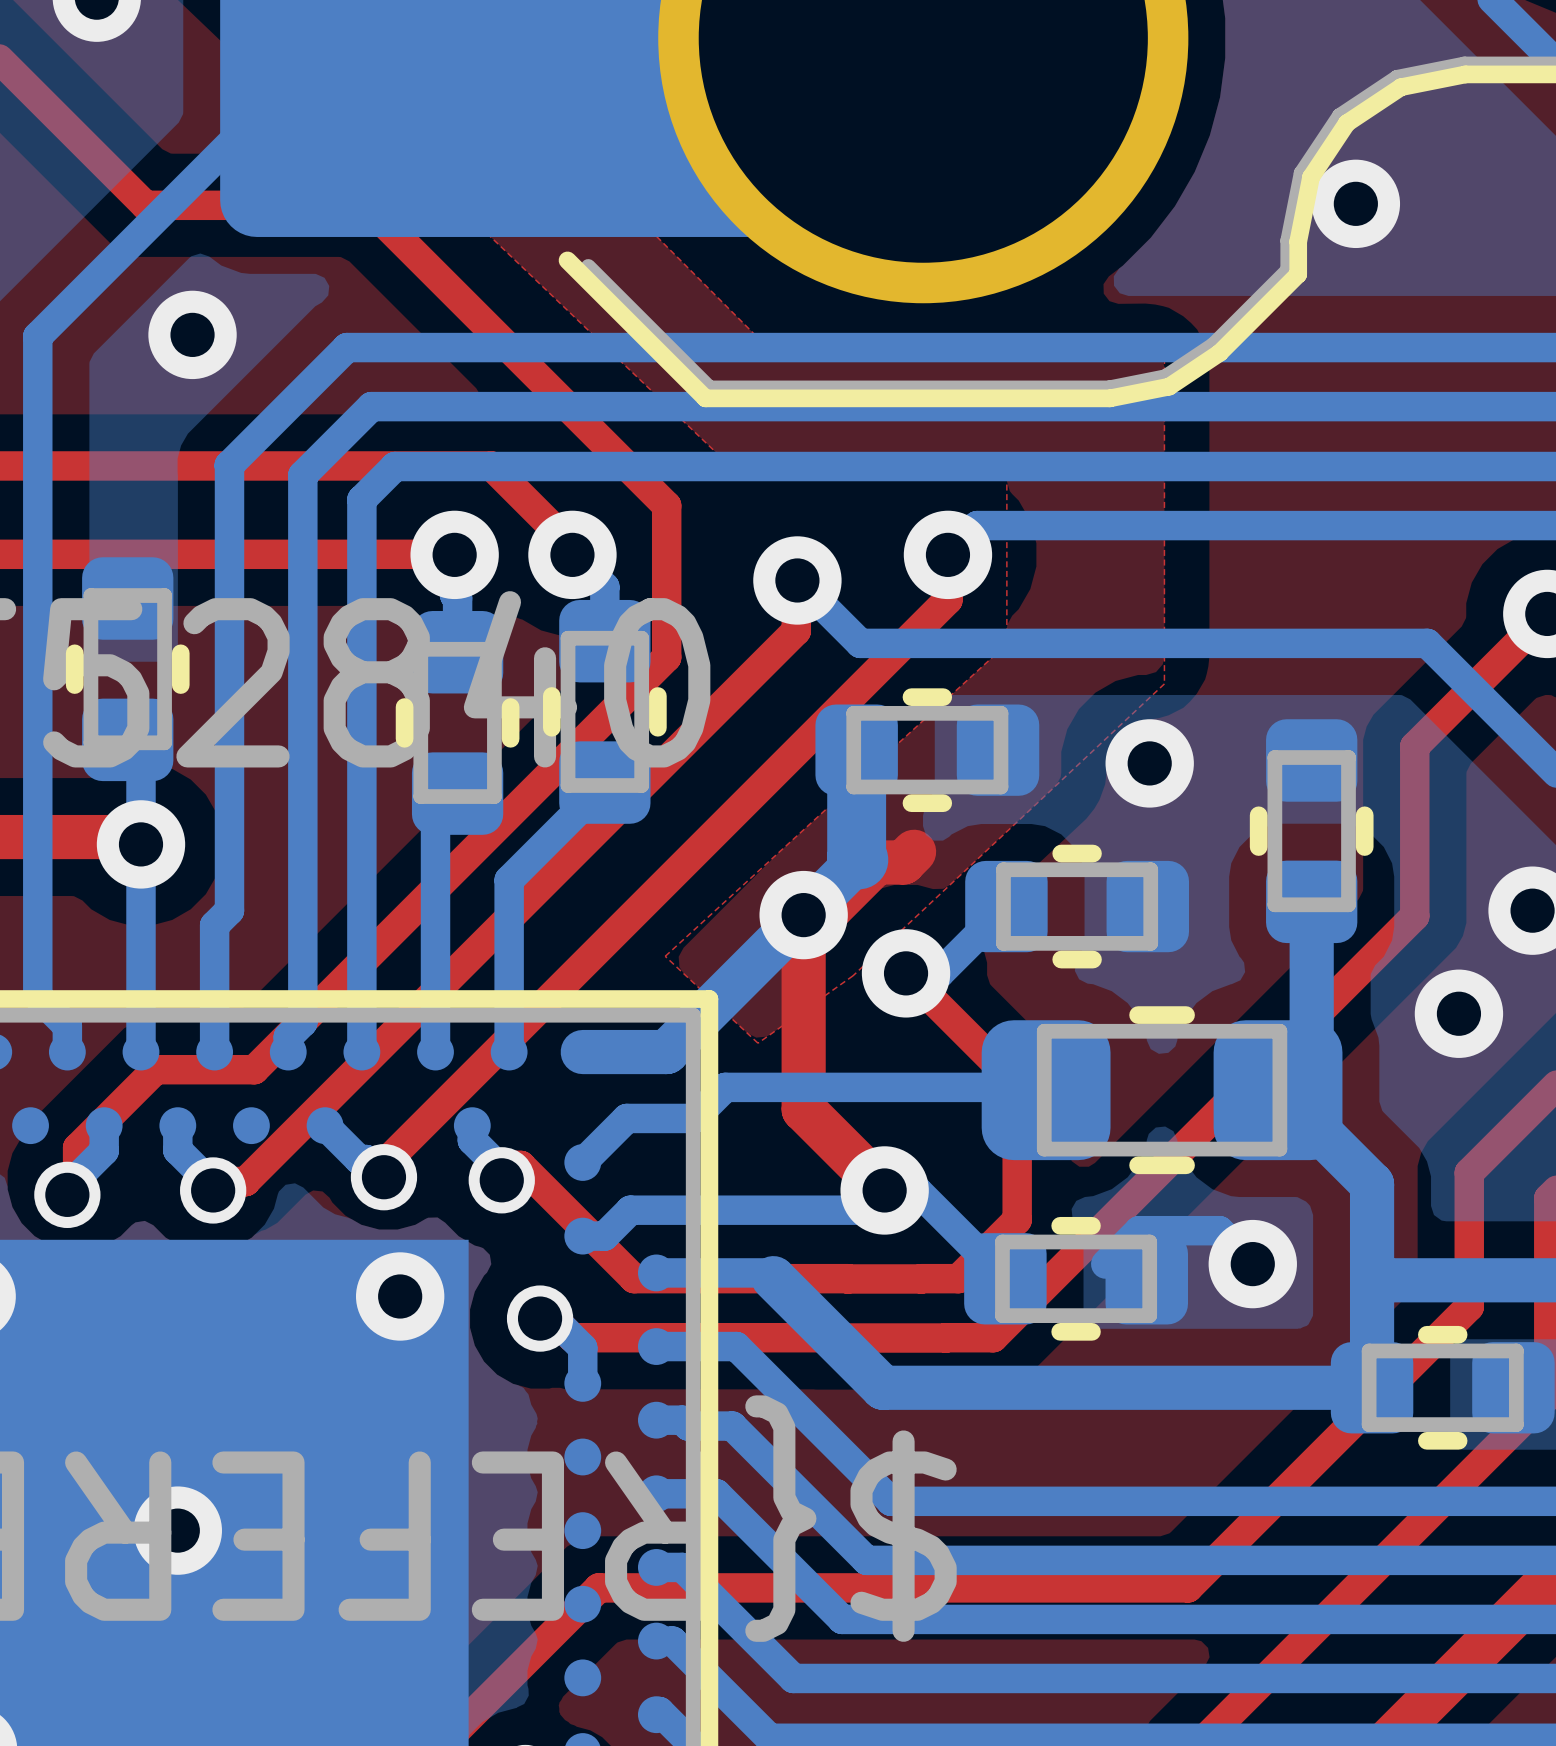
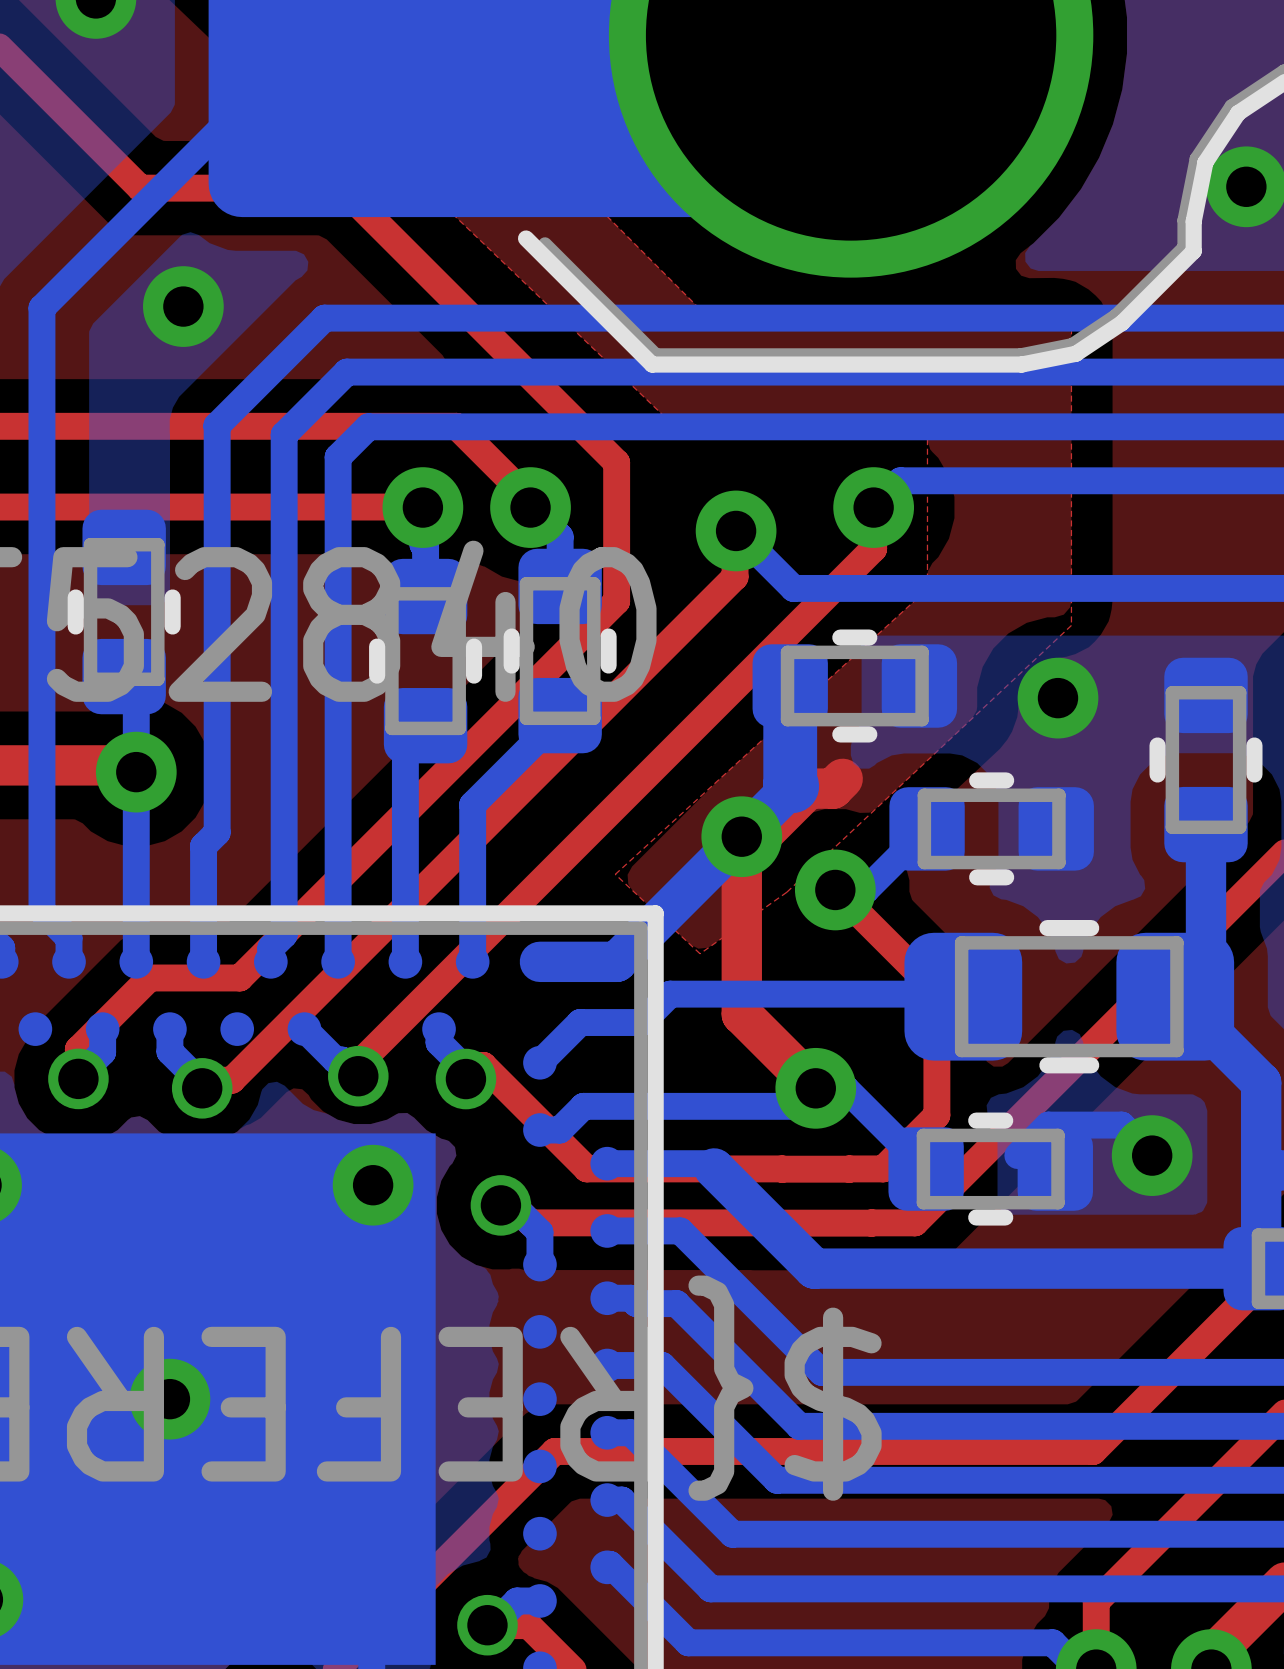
via position: (67, 1194) -> (78, 1078)

